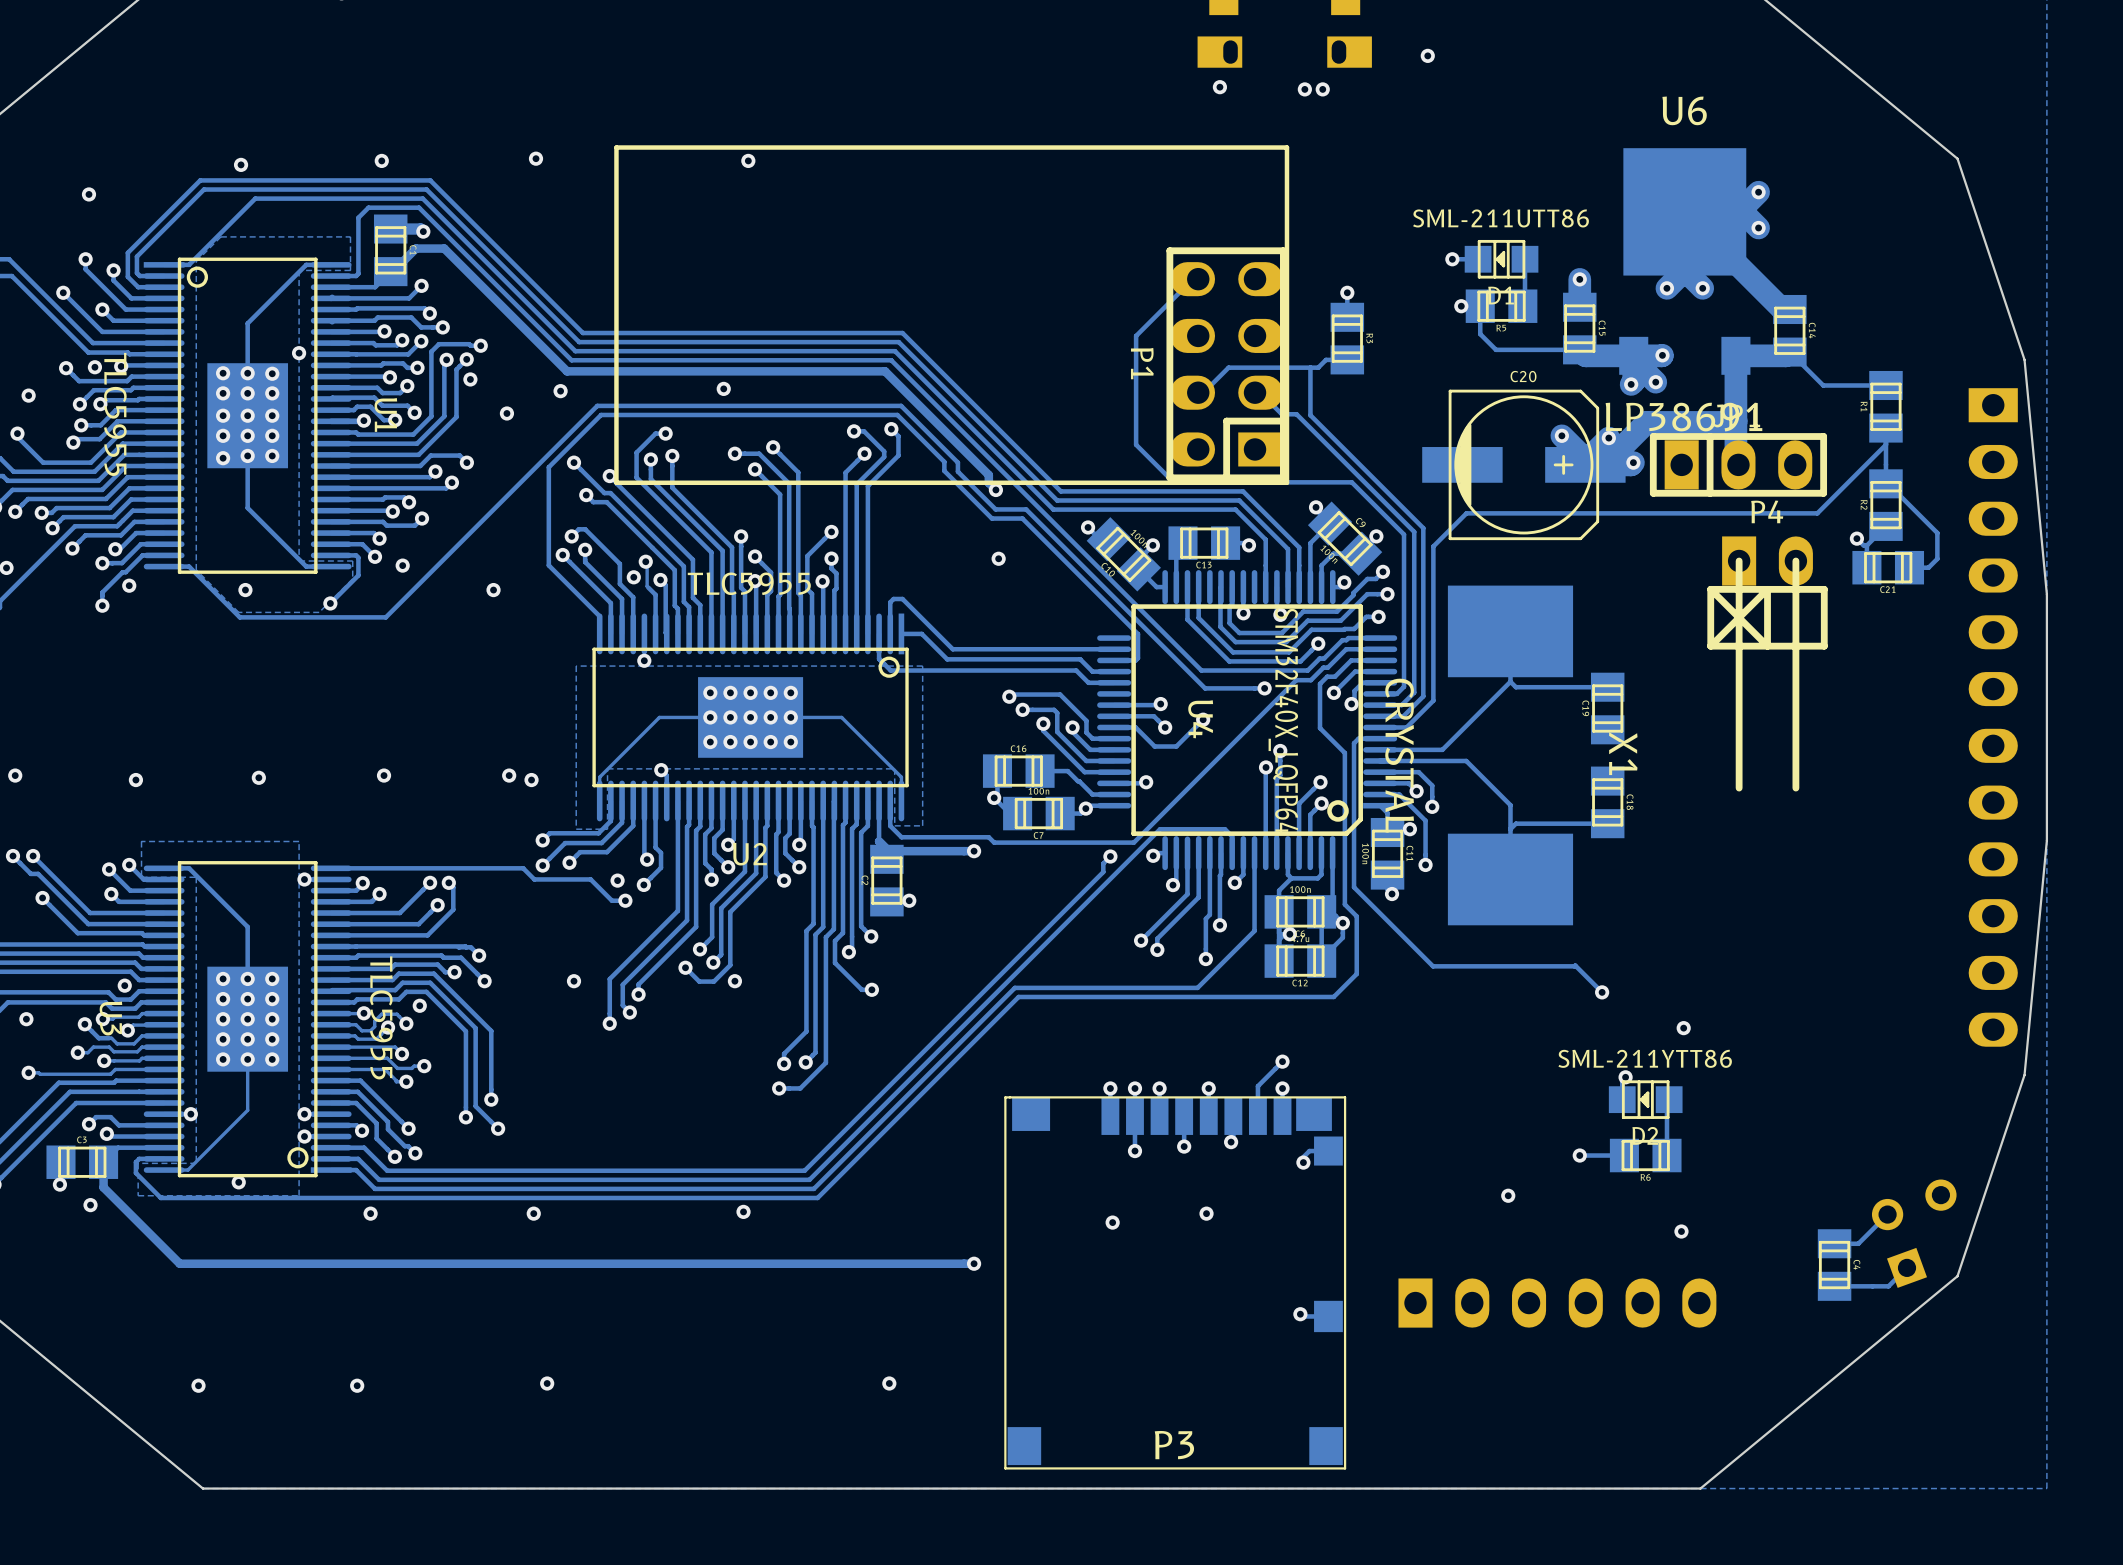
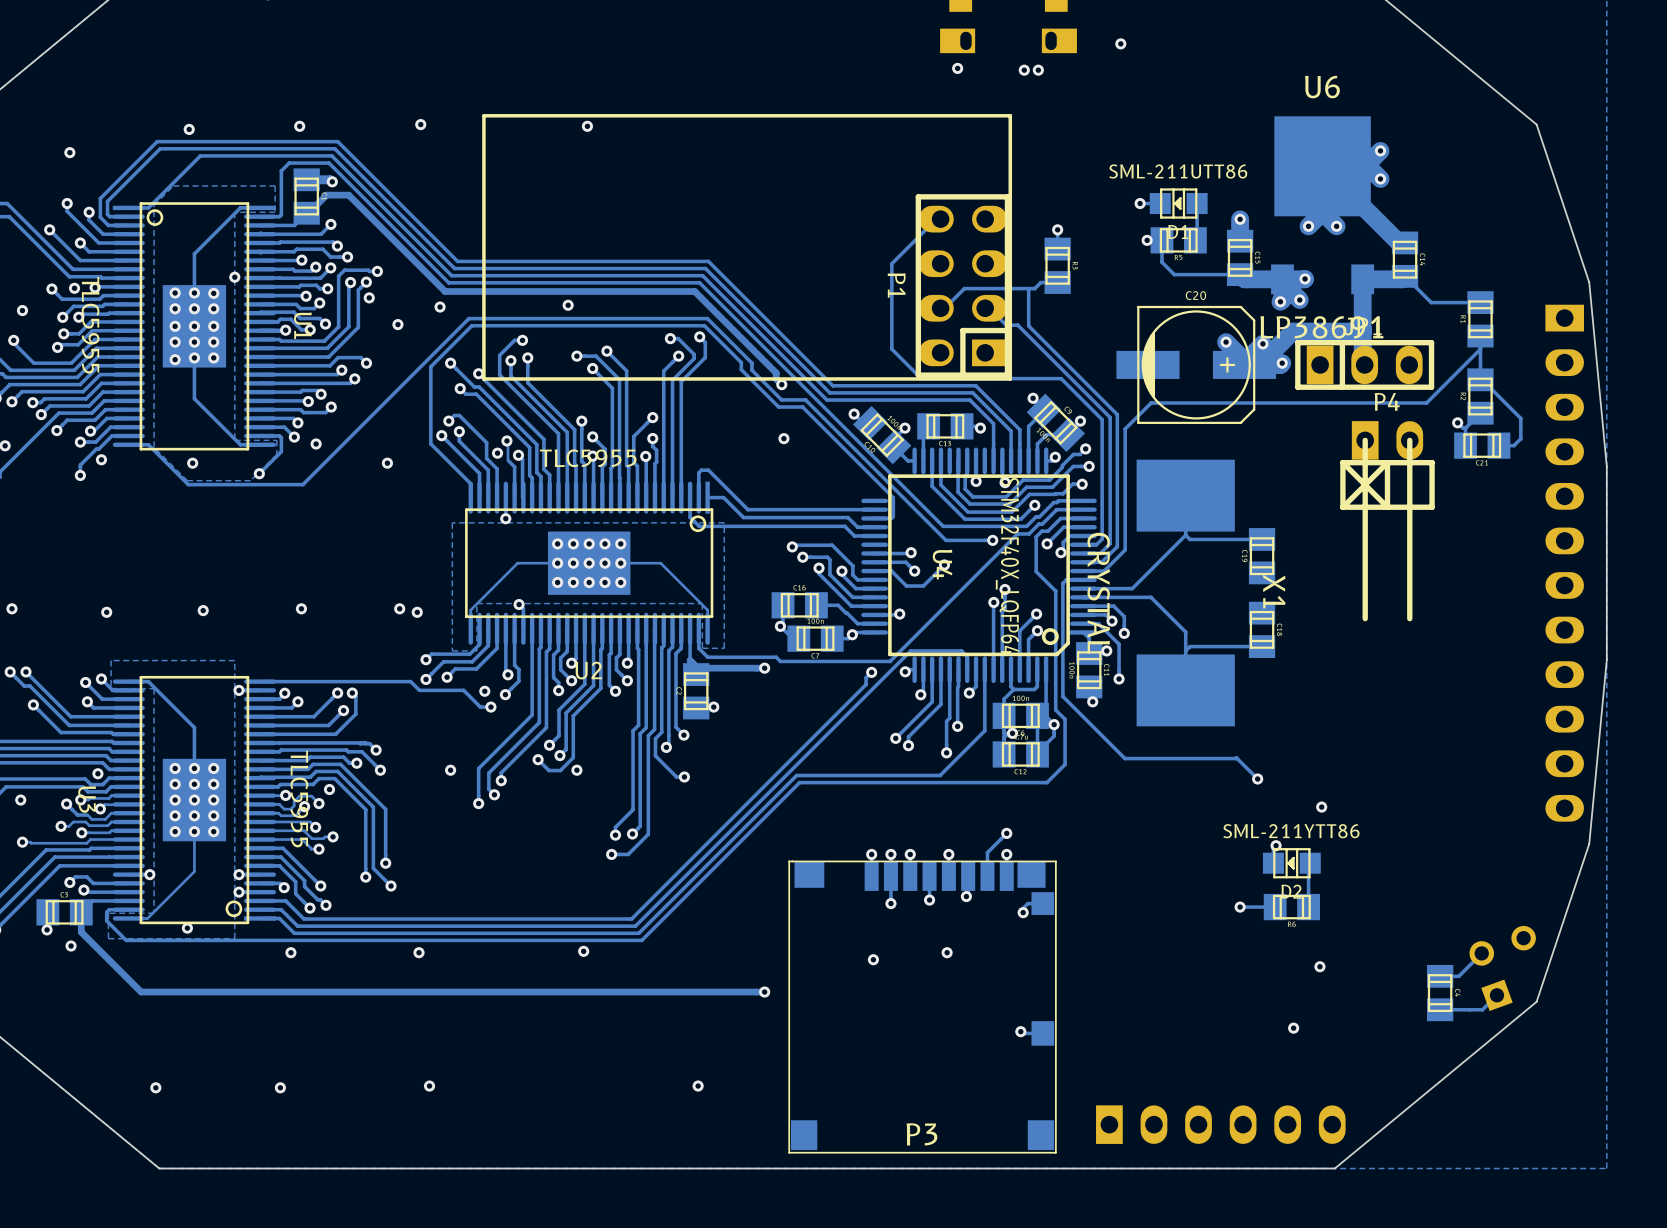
via: (1508, 1195) -> none
part position: (1557, 1303) -> (1220, 1124)
via: none -> (1293, 1028)

